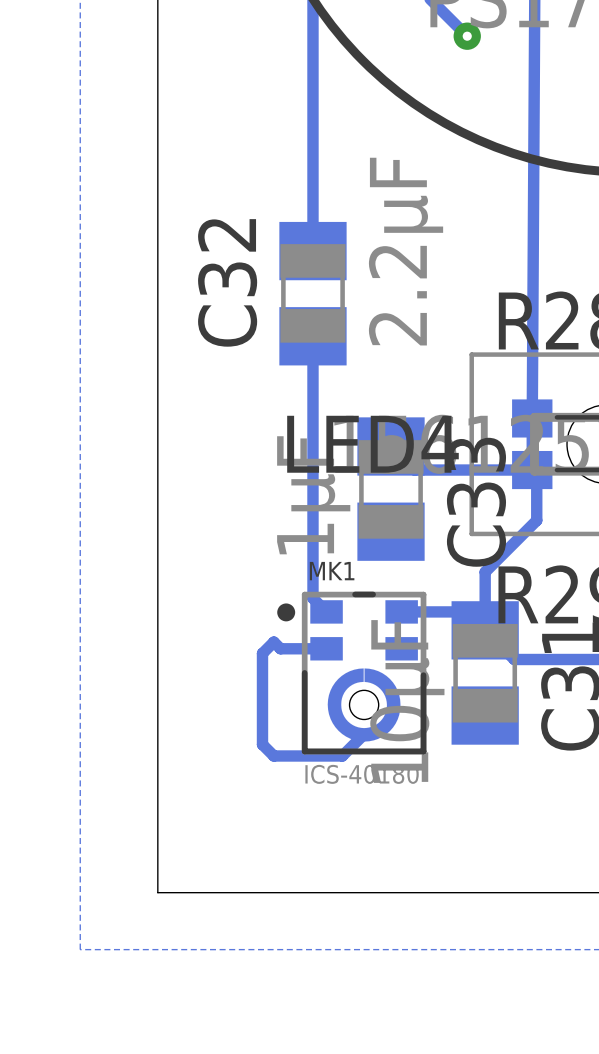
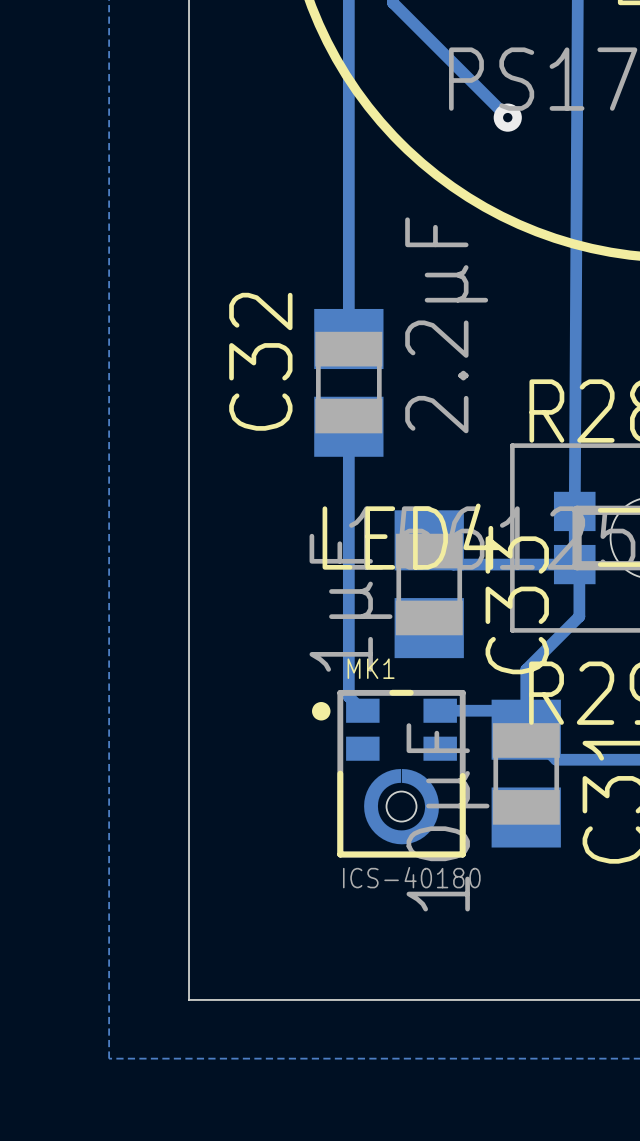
track: (326, 648) (280, 648) (273, 642) (262, 653) (262, 744) (273, 755) (342, 755) (363, 734) -> none

